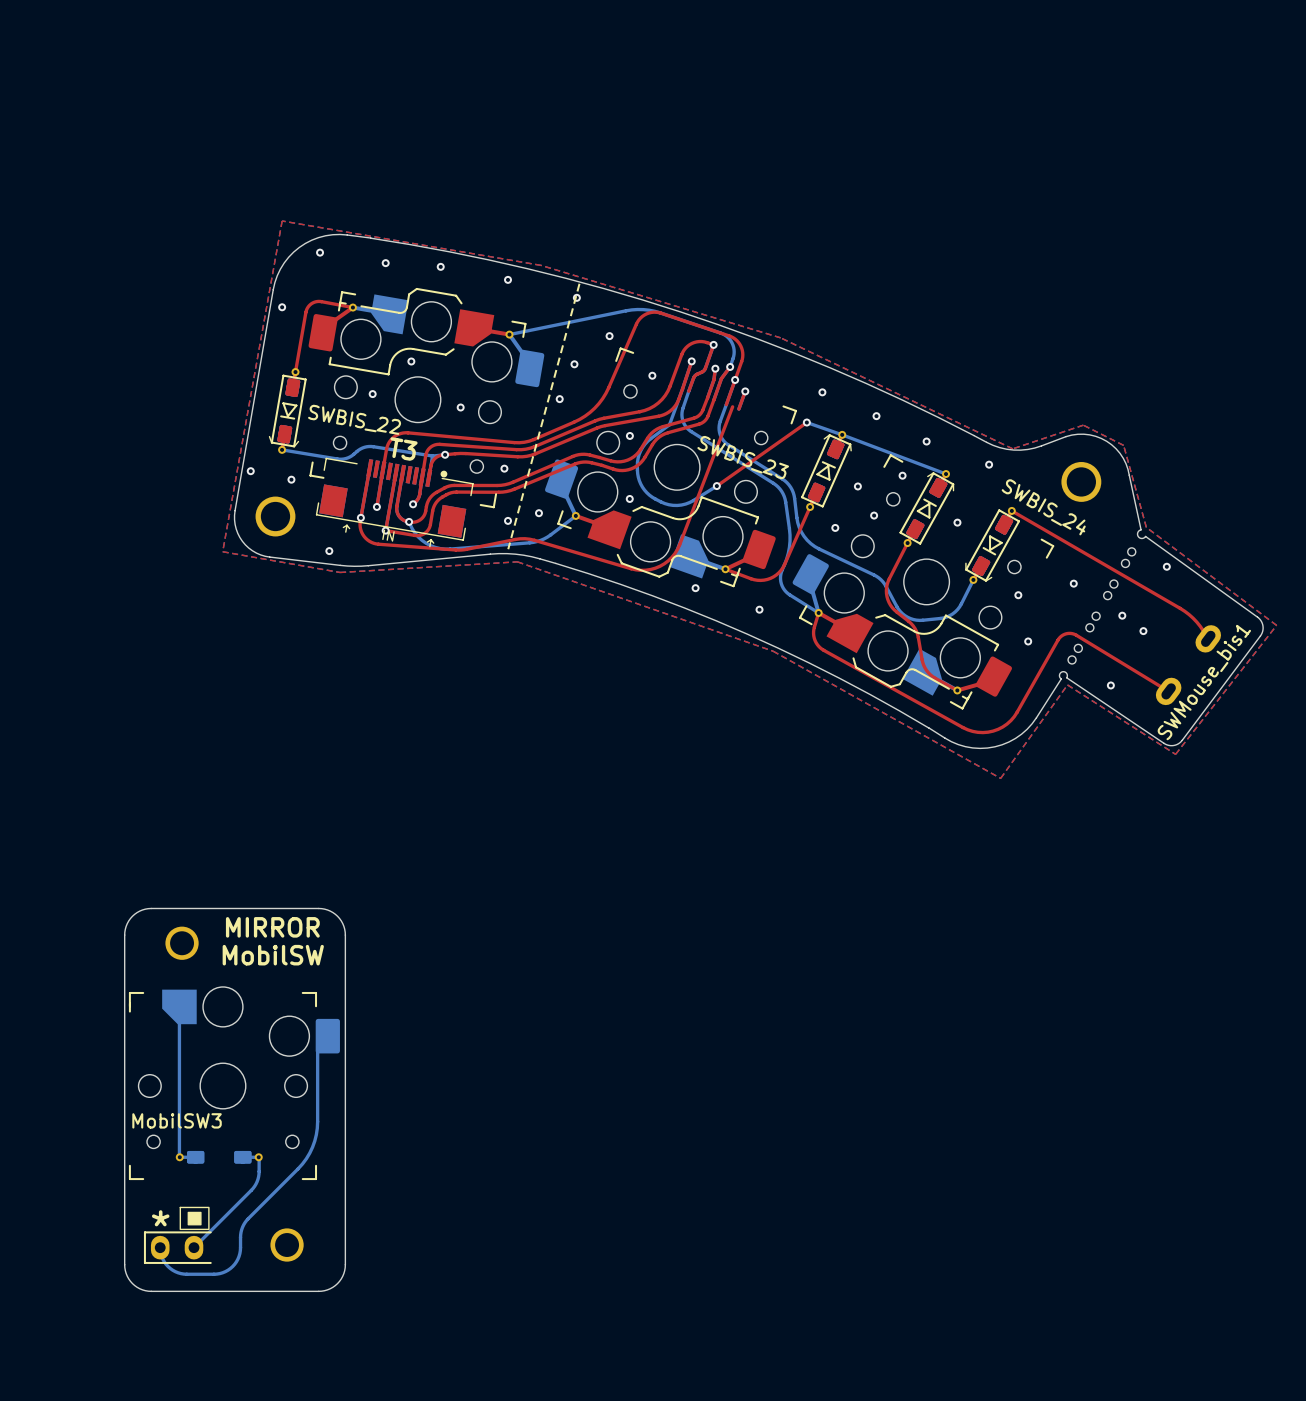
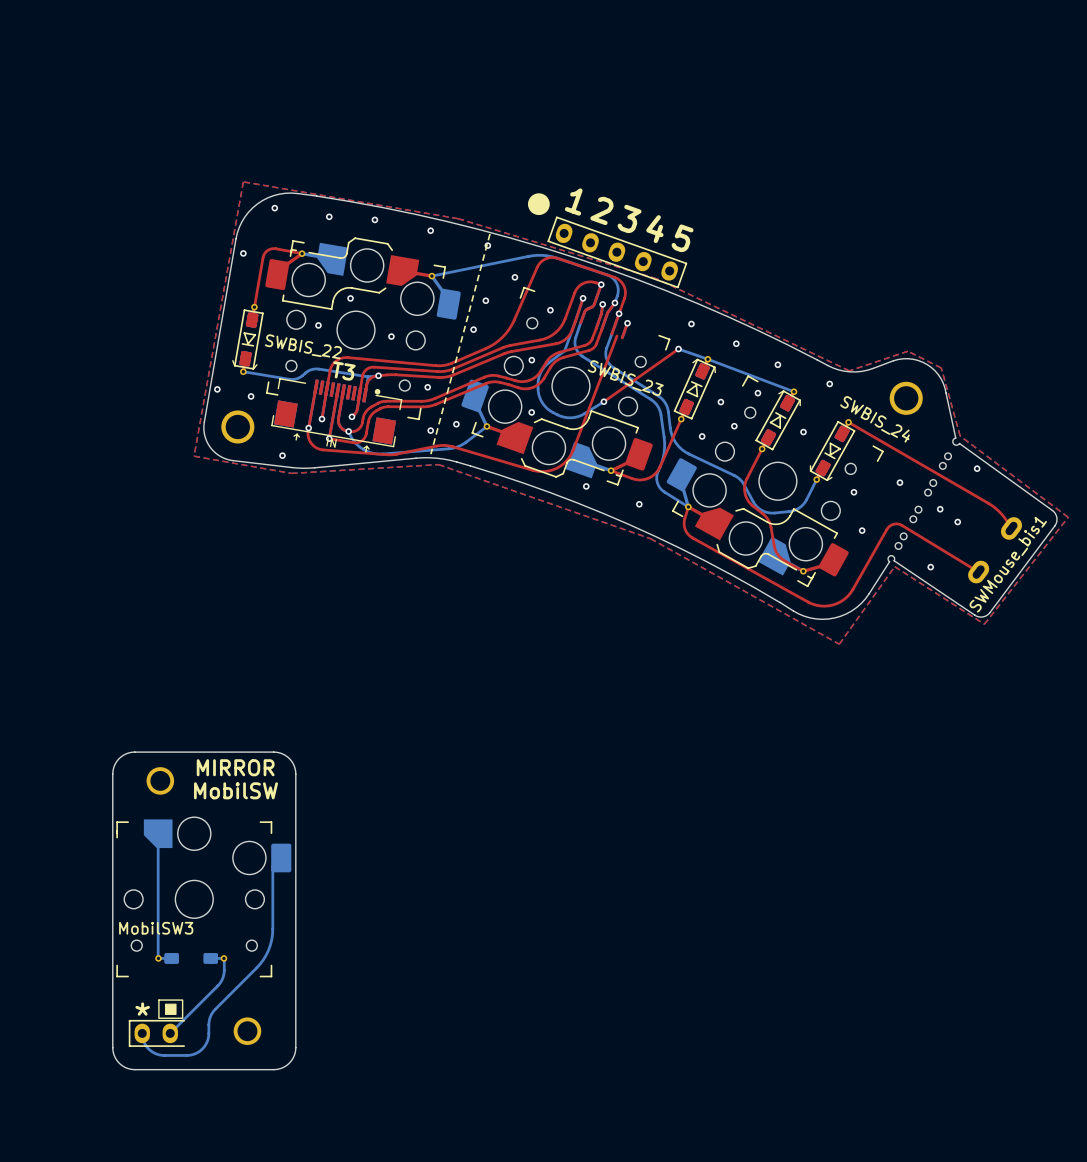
part: none -> (607, 240)

